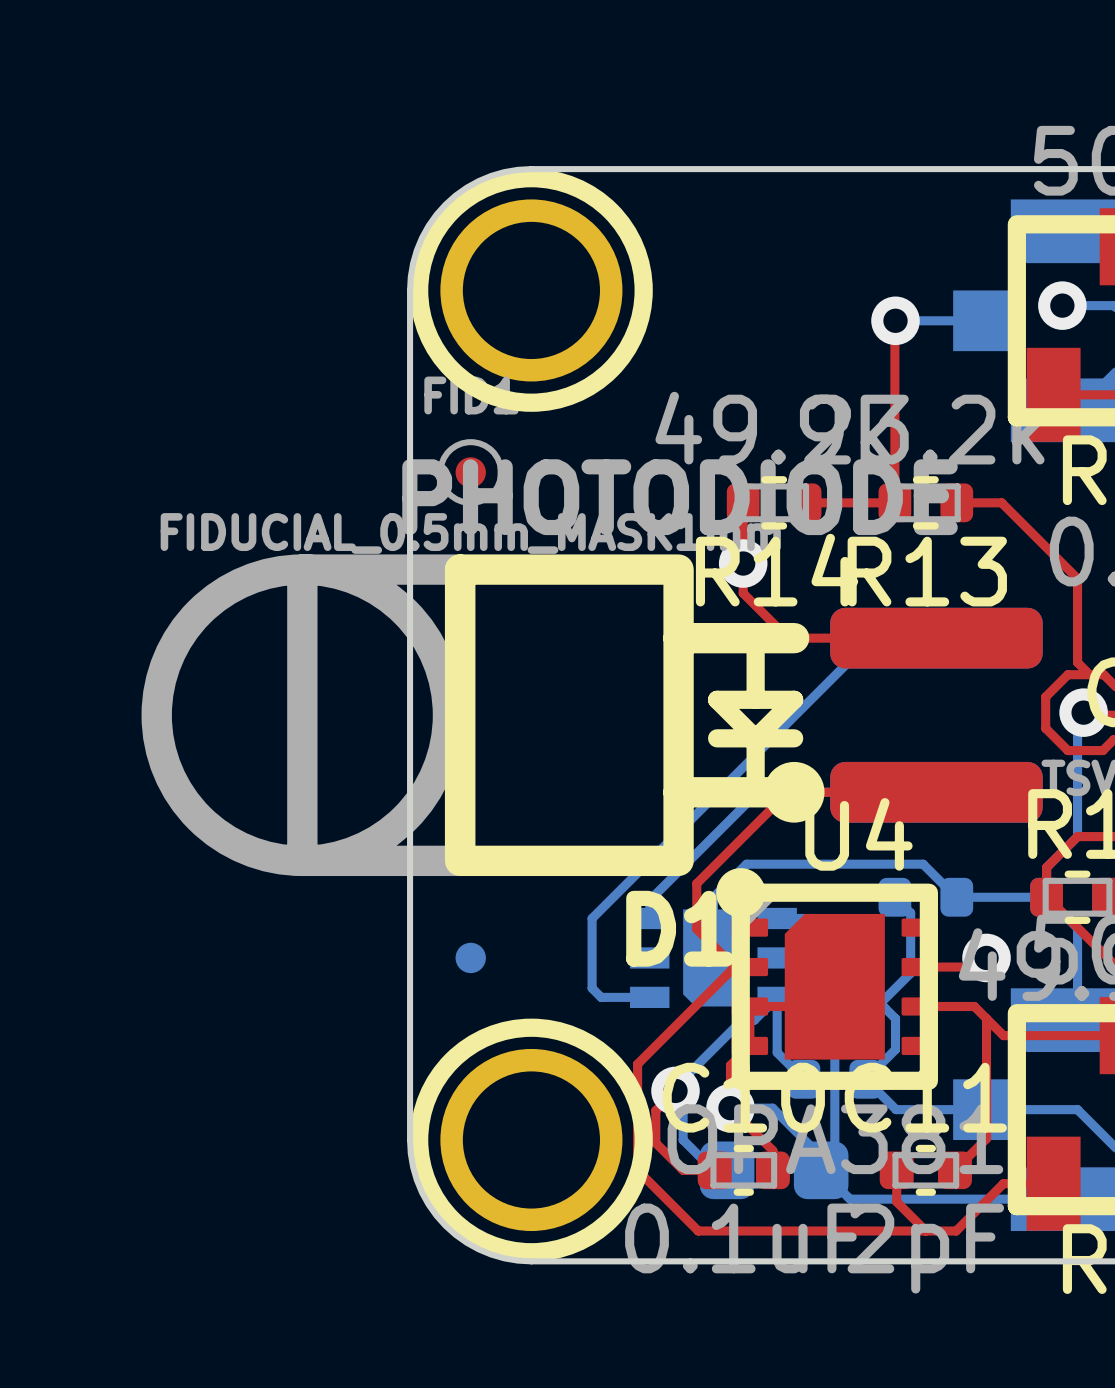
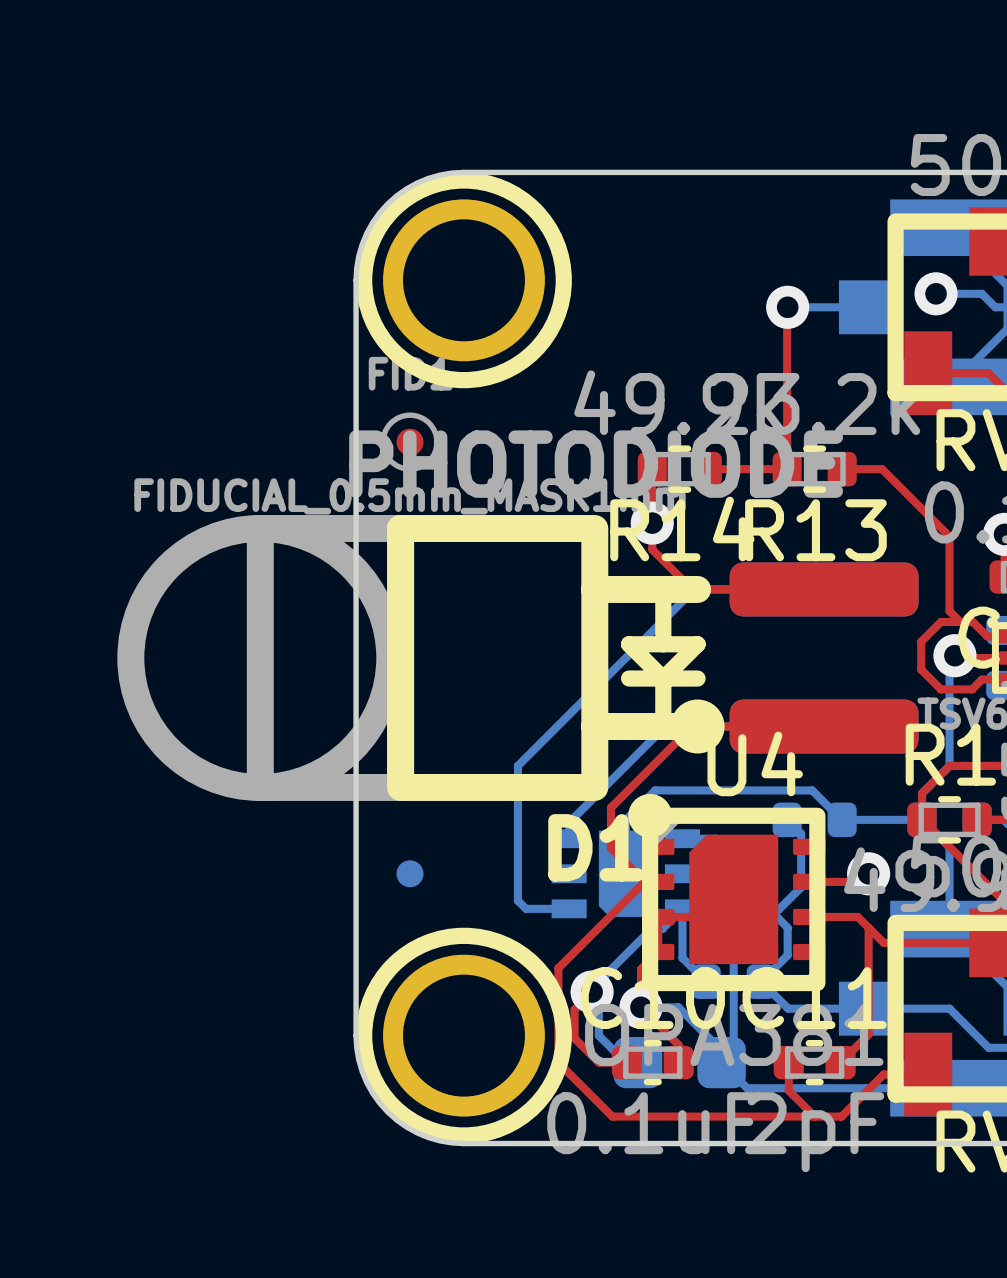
bottom track: (872, 638) (592, 918) -> (767, 589) (694, 589) (517, 765) (517, 838)

